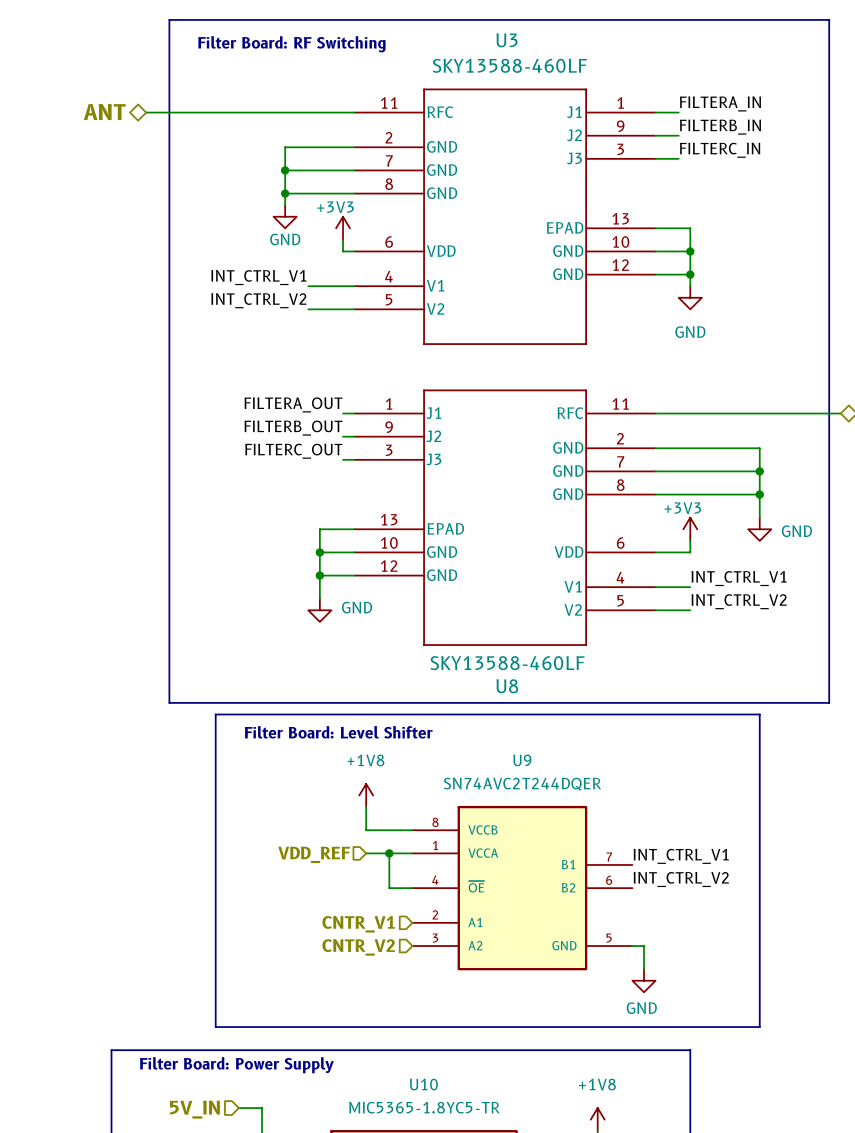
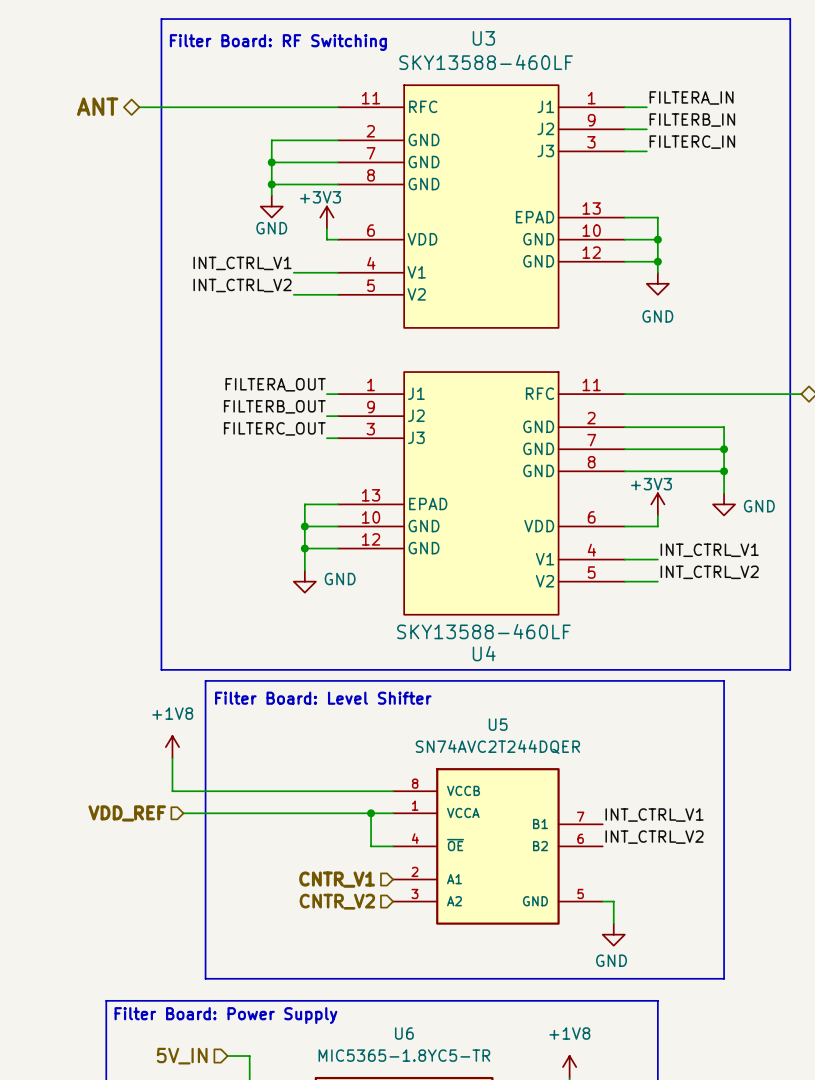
U3 symbol: [354, 88, 656, 345] -> [337, 85, 625, 328]
U8: SKY13588-460LF (505, 517) -> none
U4: none -> SKY13588-460LF (481, 493)
U9 name: U9 (522, 760) -> U5 (498, 724)
power symbol position: +1V8 (366, 795) -> +1V8 (172, 747)
wire: (366, 807) (366, 830) -> (172, 758) (172, 791) (348, 791)
wire: none -> (183, 813) (348, 813)
hierarchical label position: VDD_REF (314, 854) -> VDD_REF (127, 813)
U10 name: U10 (423, 1084) -> U6 (404, 1033)

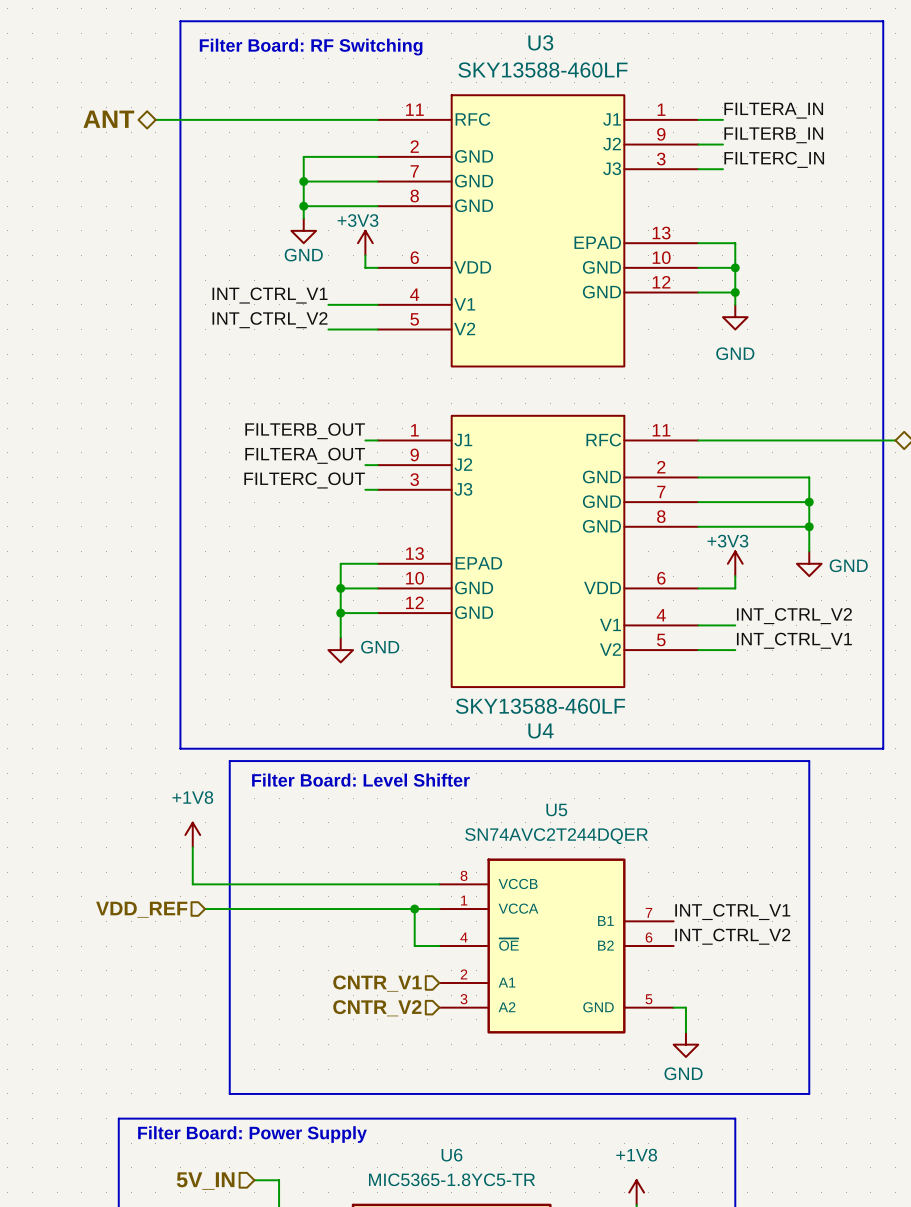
label: FILTERA_OUT (275, 384) -> FILTERB_OUT (305, 431)
label: FILTERB_OUT (274, 406) -> FILTERA_OUT (305, 455)
label: INT_CTRL_V1 (709, 550) -> INT_CTRL_V2 (794, 616)
label: INT_CTRL_V2 (709, 572) -> INT_CTRL_V1 (794, 640)

